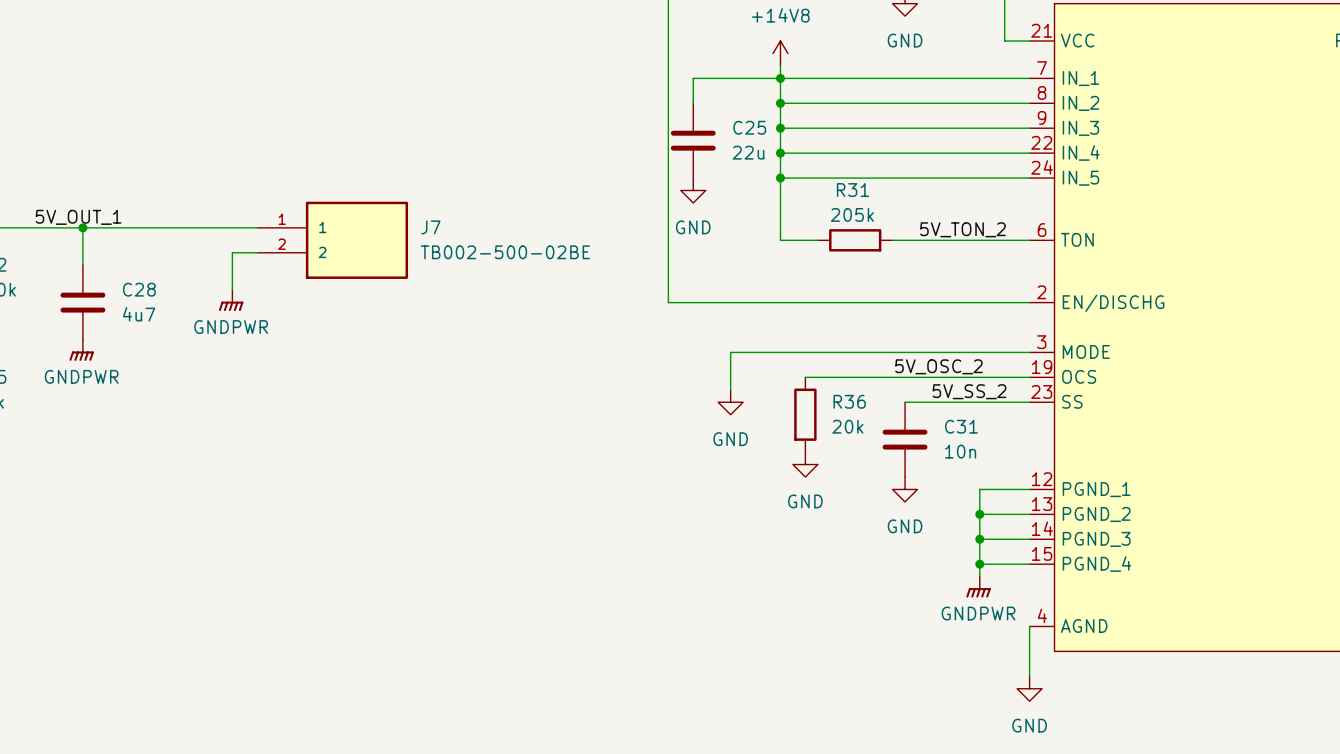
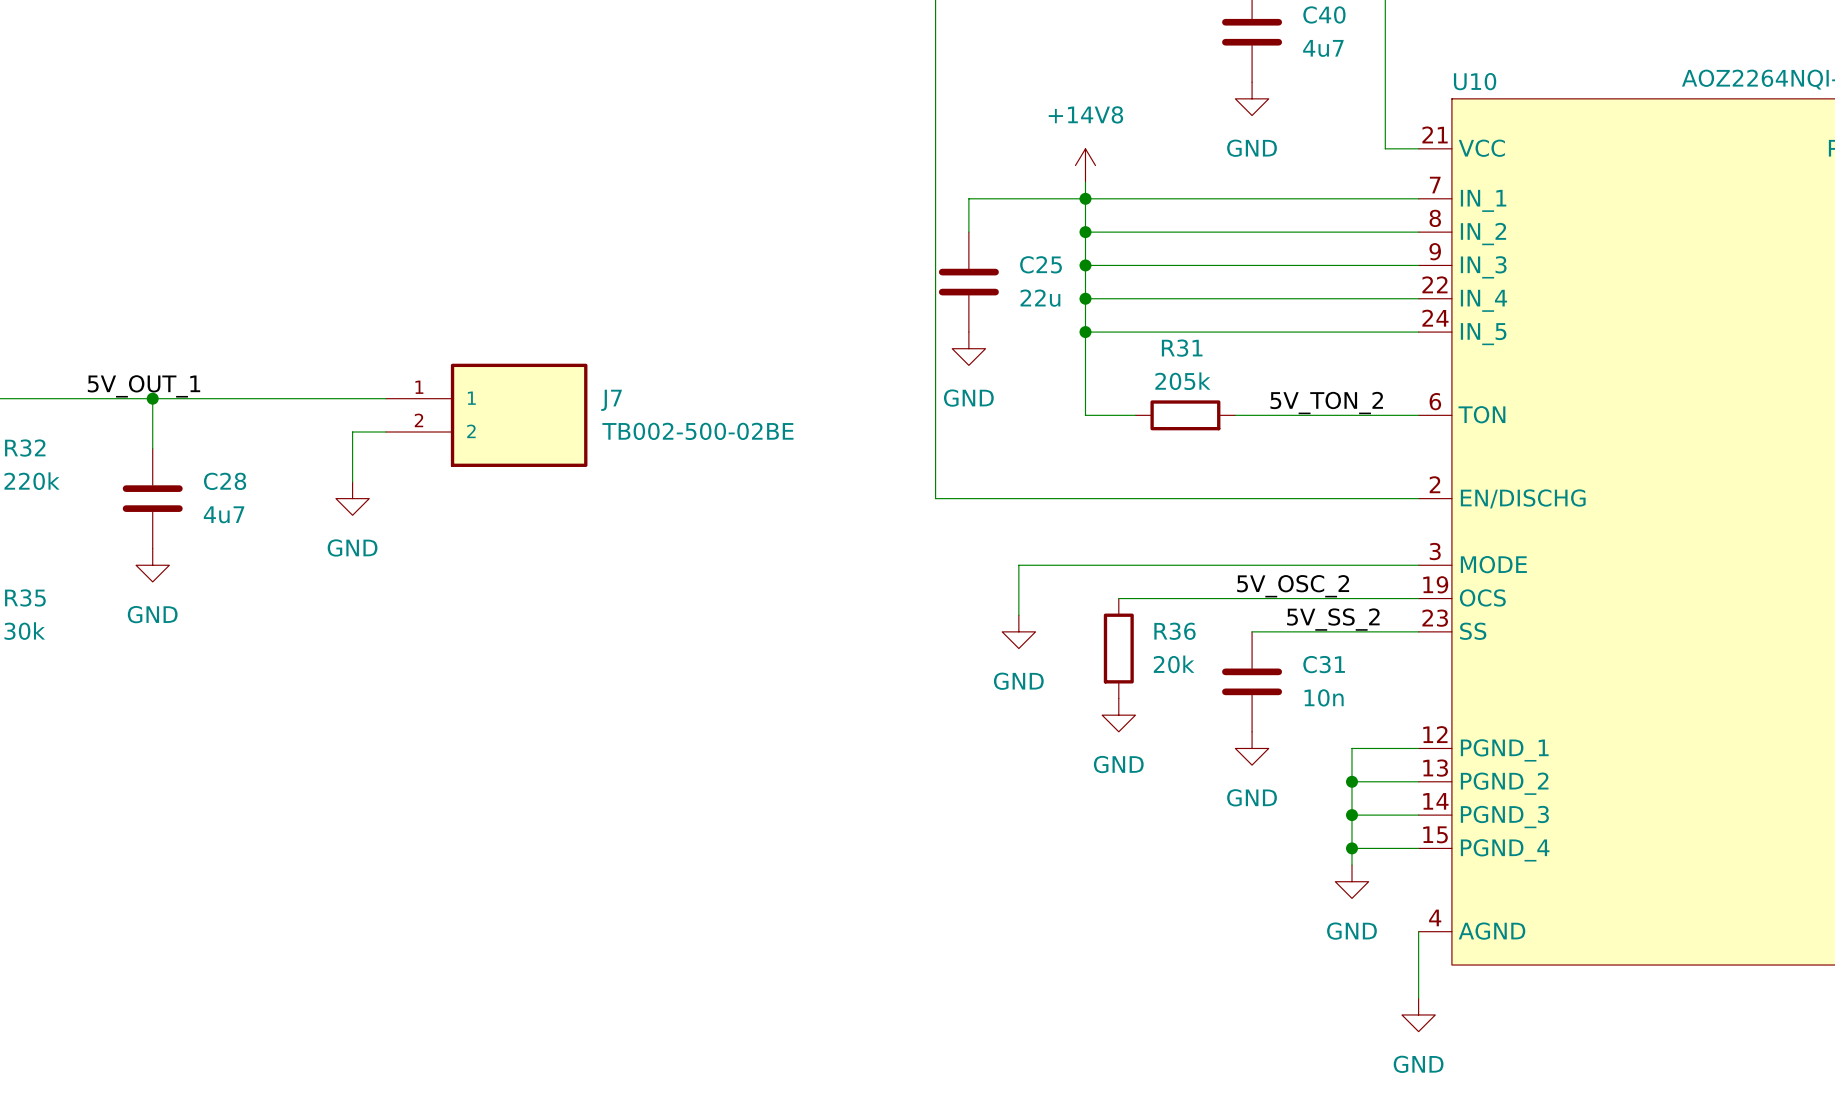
power symbol: GNDPWR (231, 300) -> GND (352, 498)
power symbol: GNDPWR (81, 350) -> GND (152, 565)
power symbol: GNDPWR (978, 587) -> GND (1351, 881)

